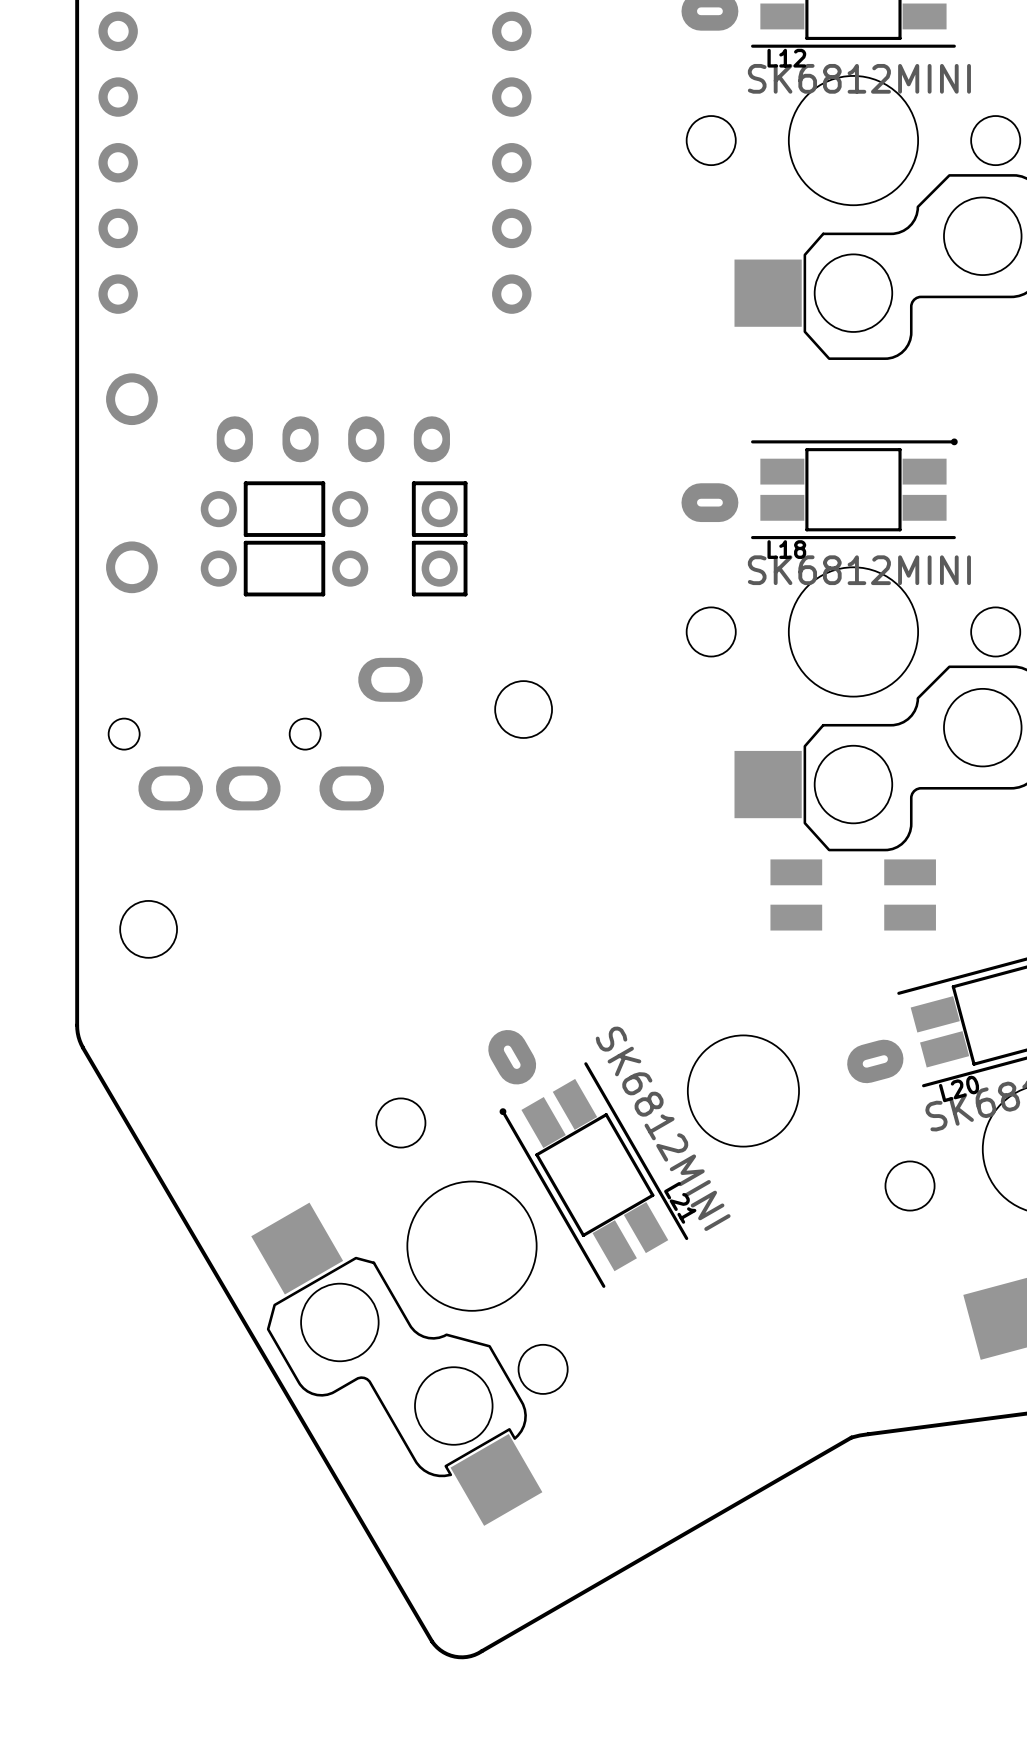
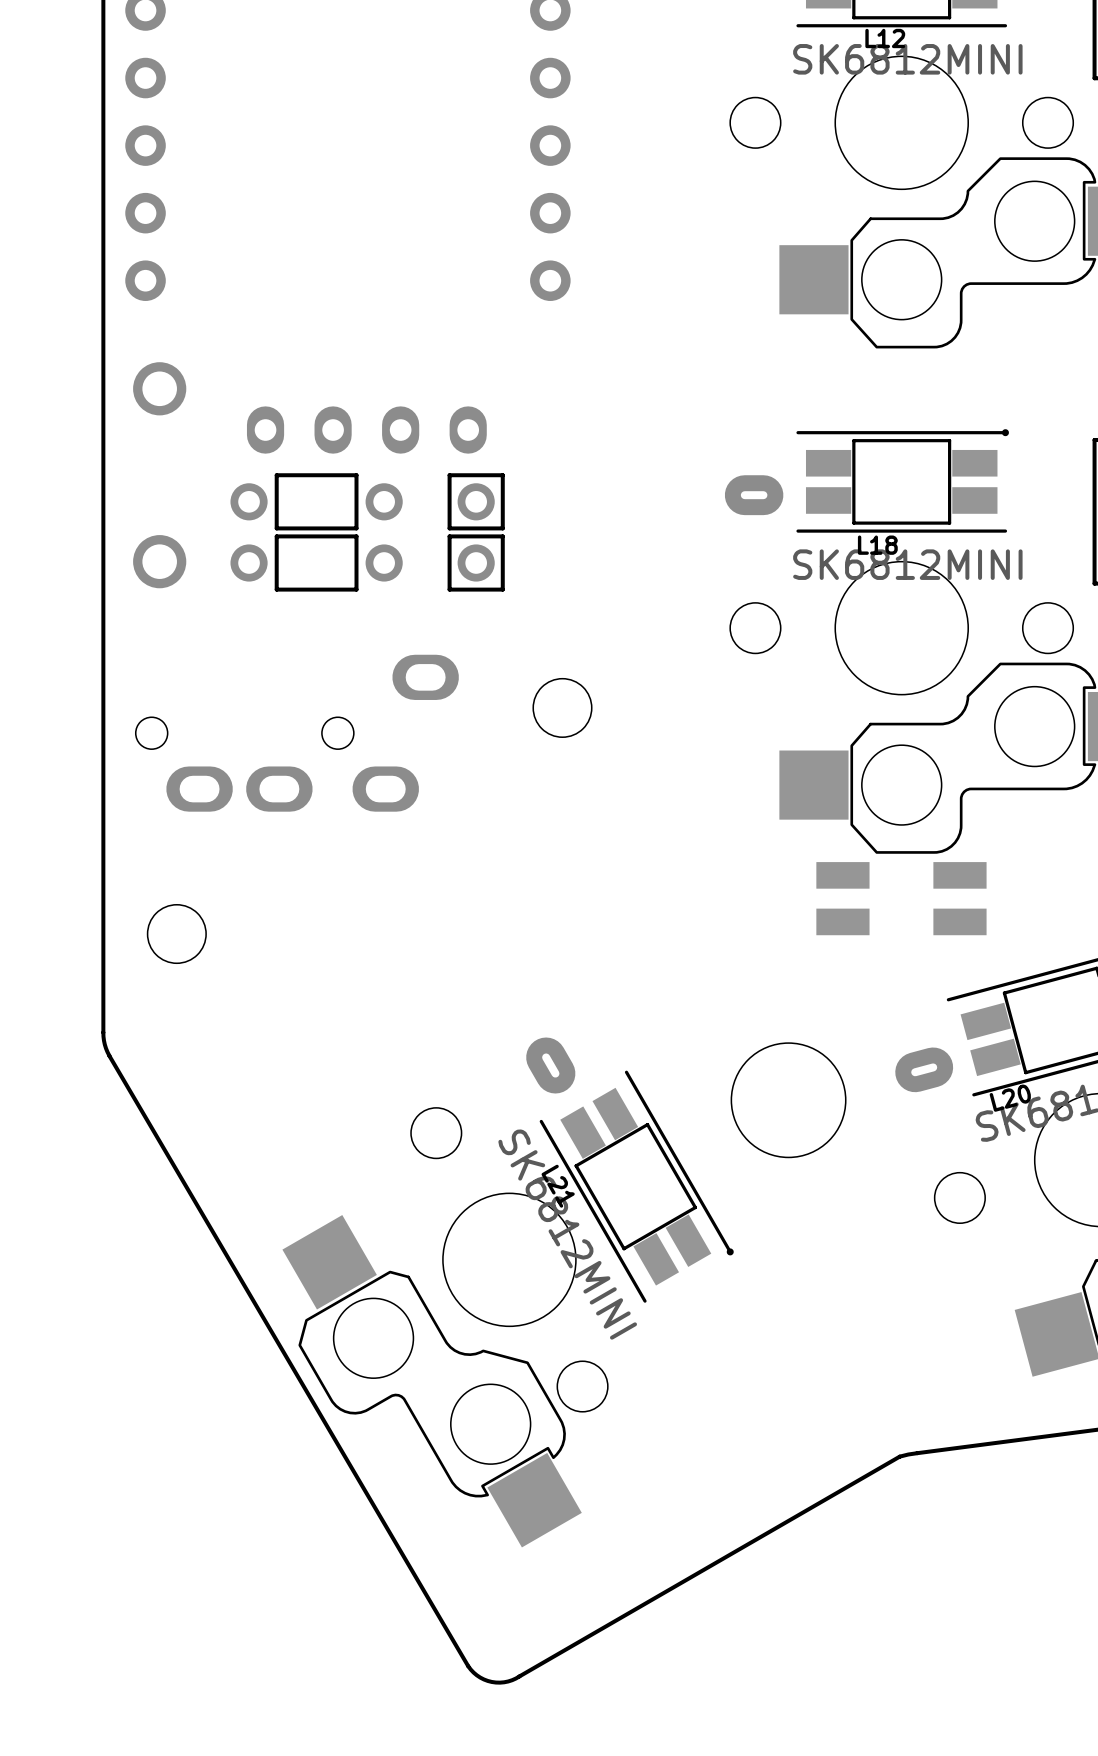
L12 name position: L12 (786, 58) -> L12 (885, 38)
L18 name position: L18 (786, 549) -> L18 (877, 545)
L21 rotation: 0° (593, 1175) -> 180° (636, 1186)

